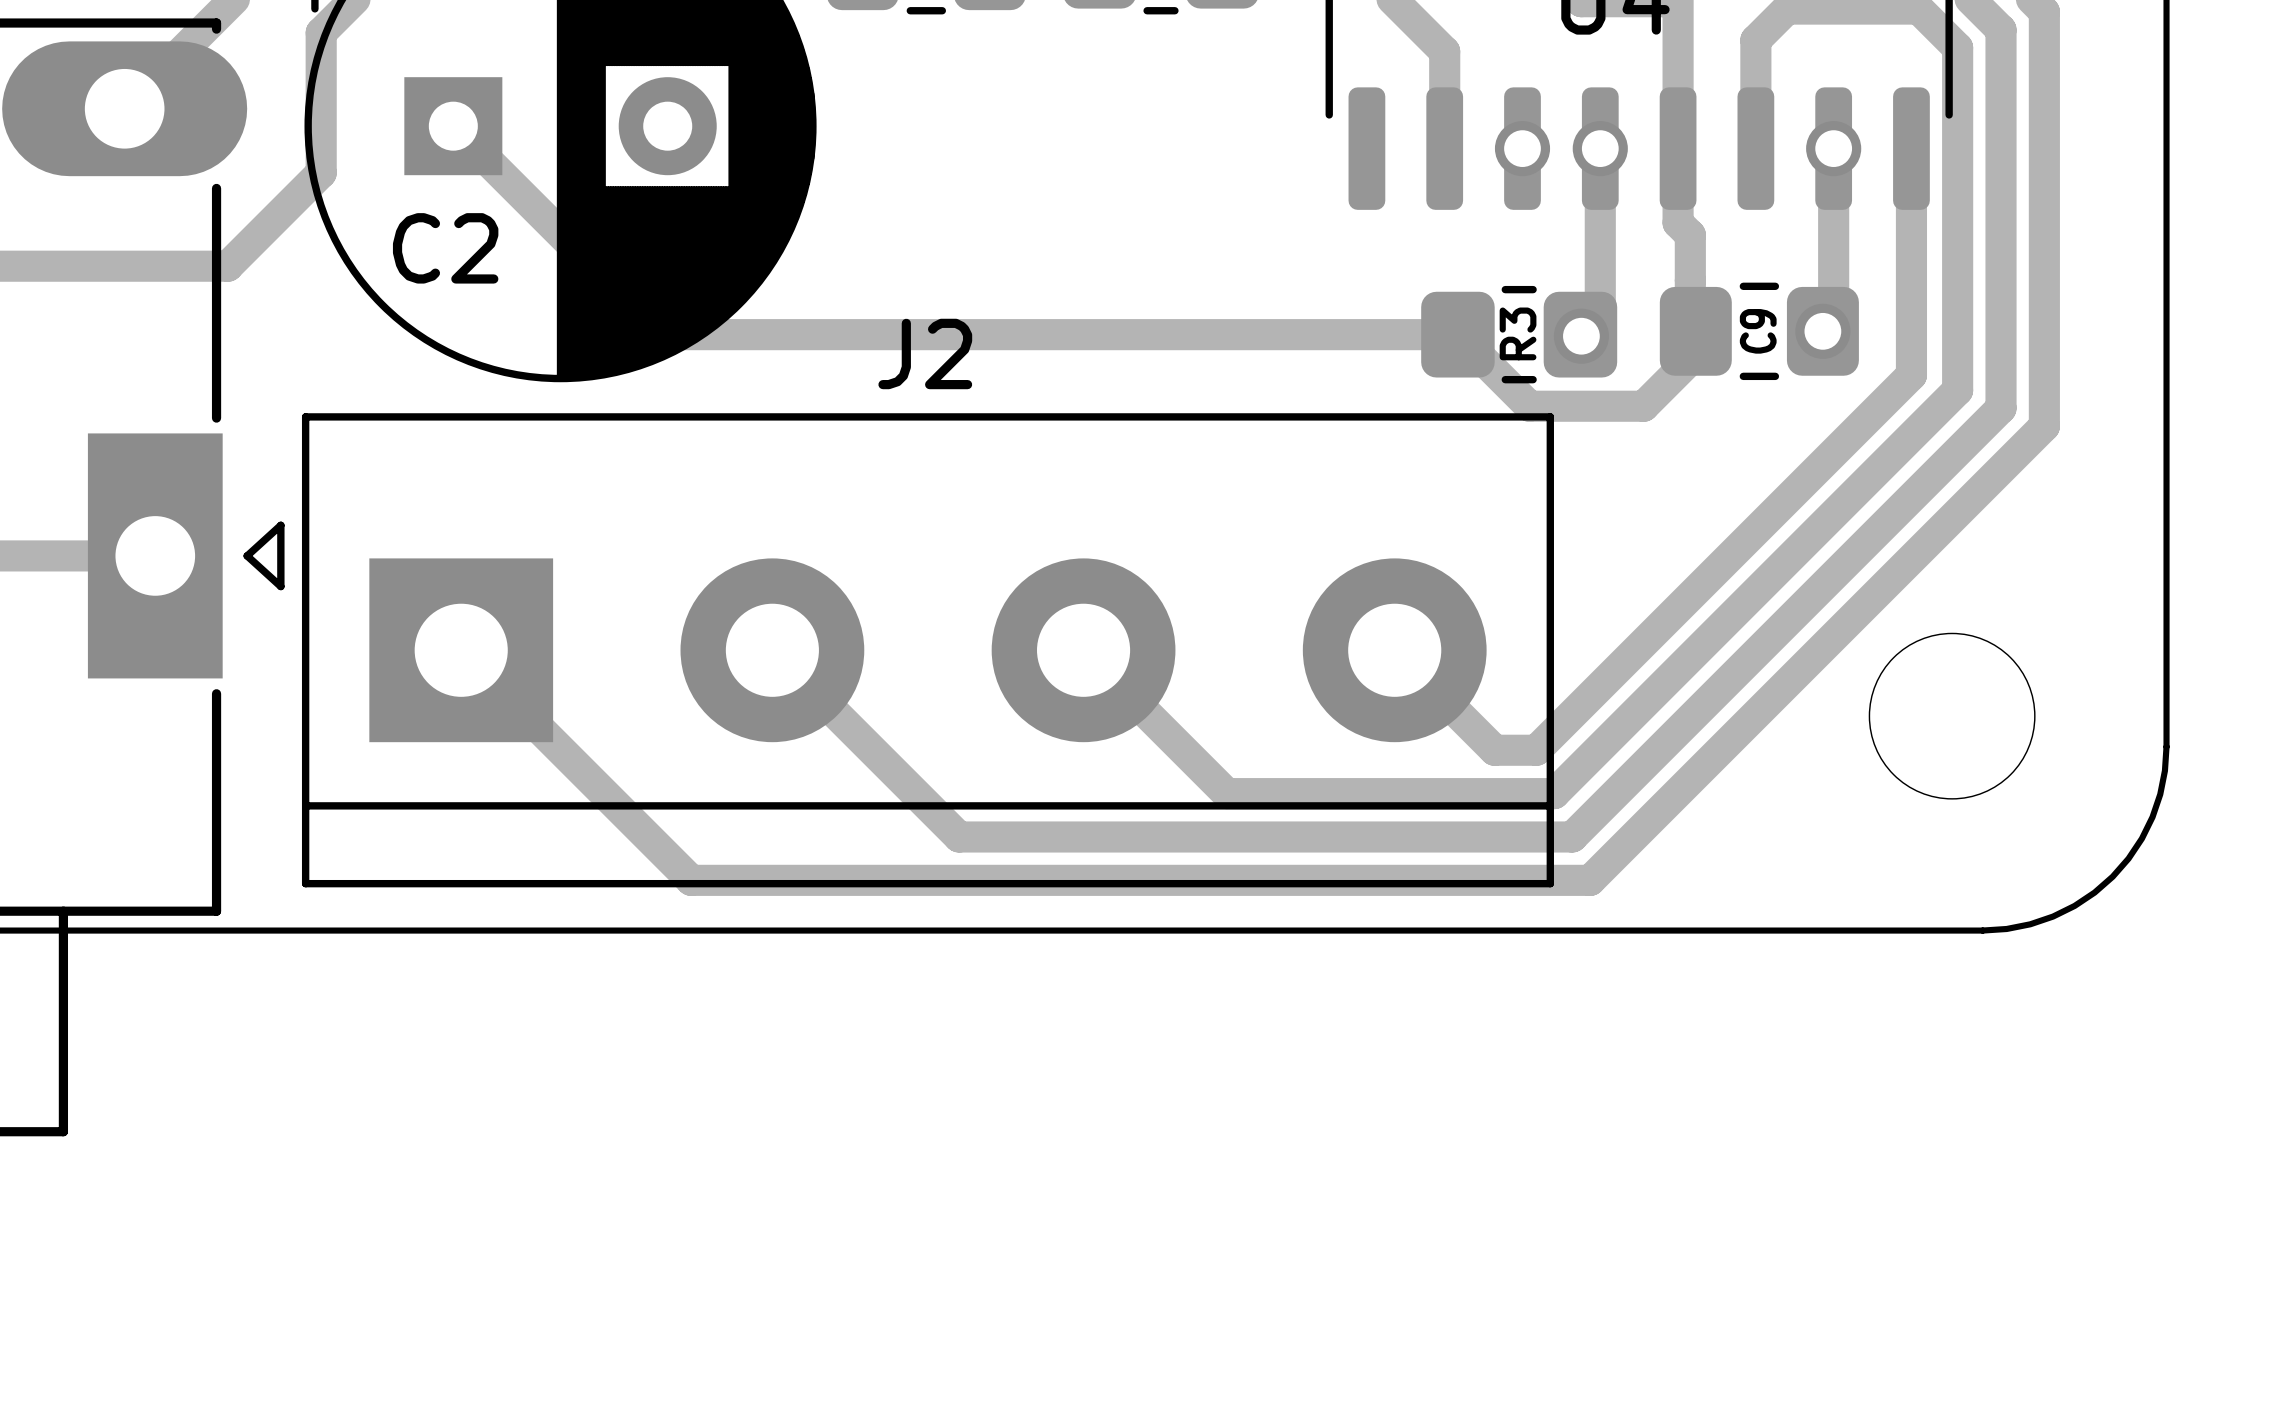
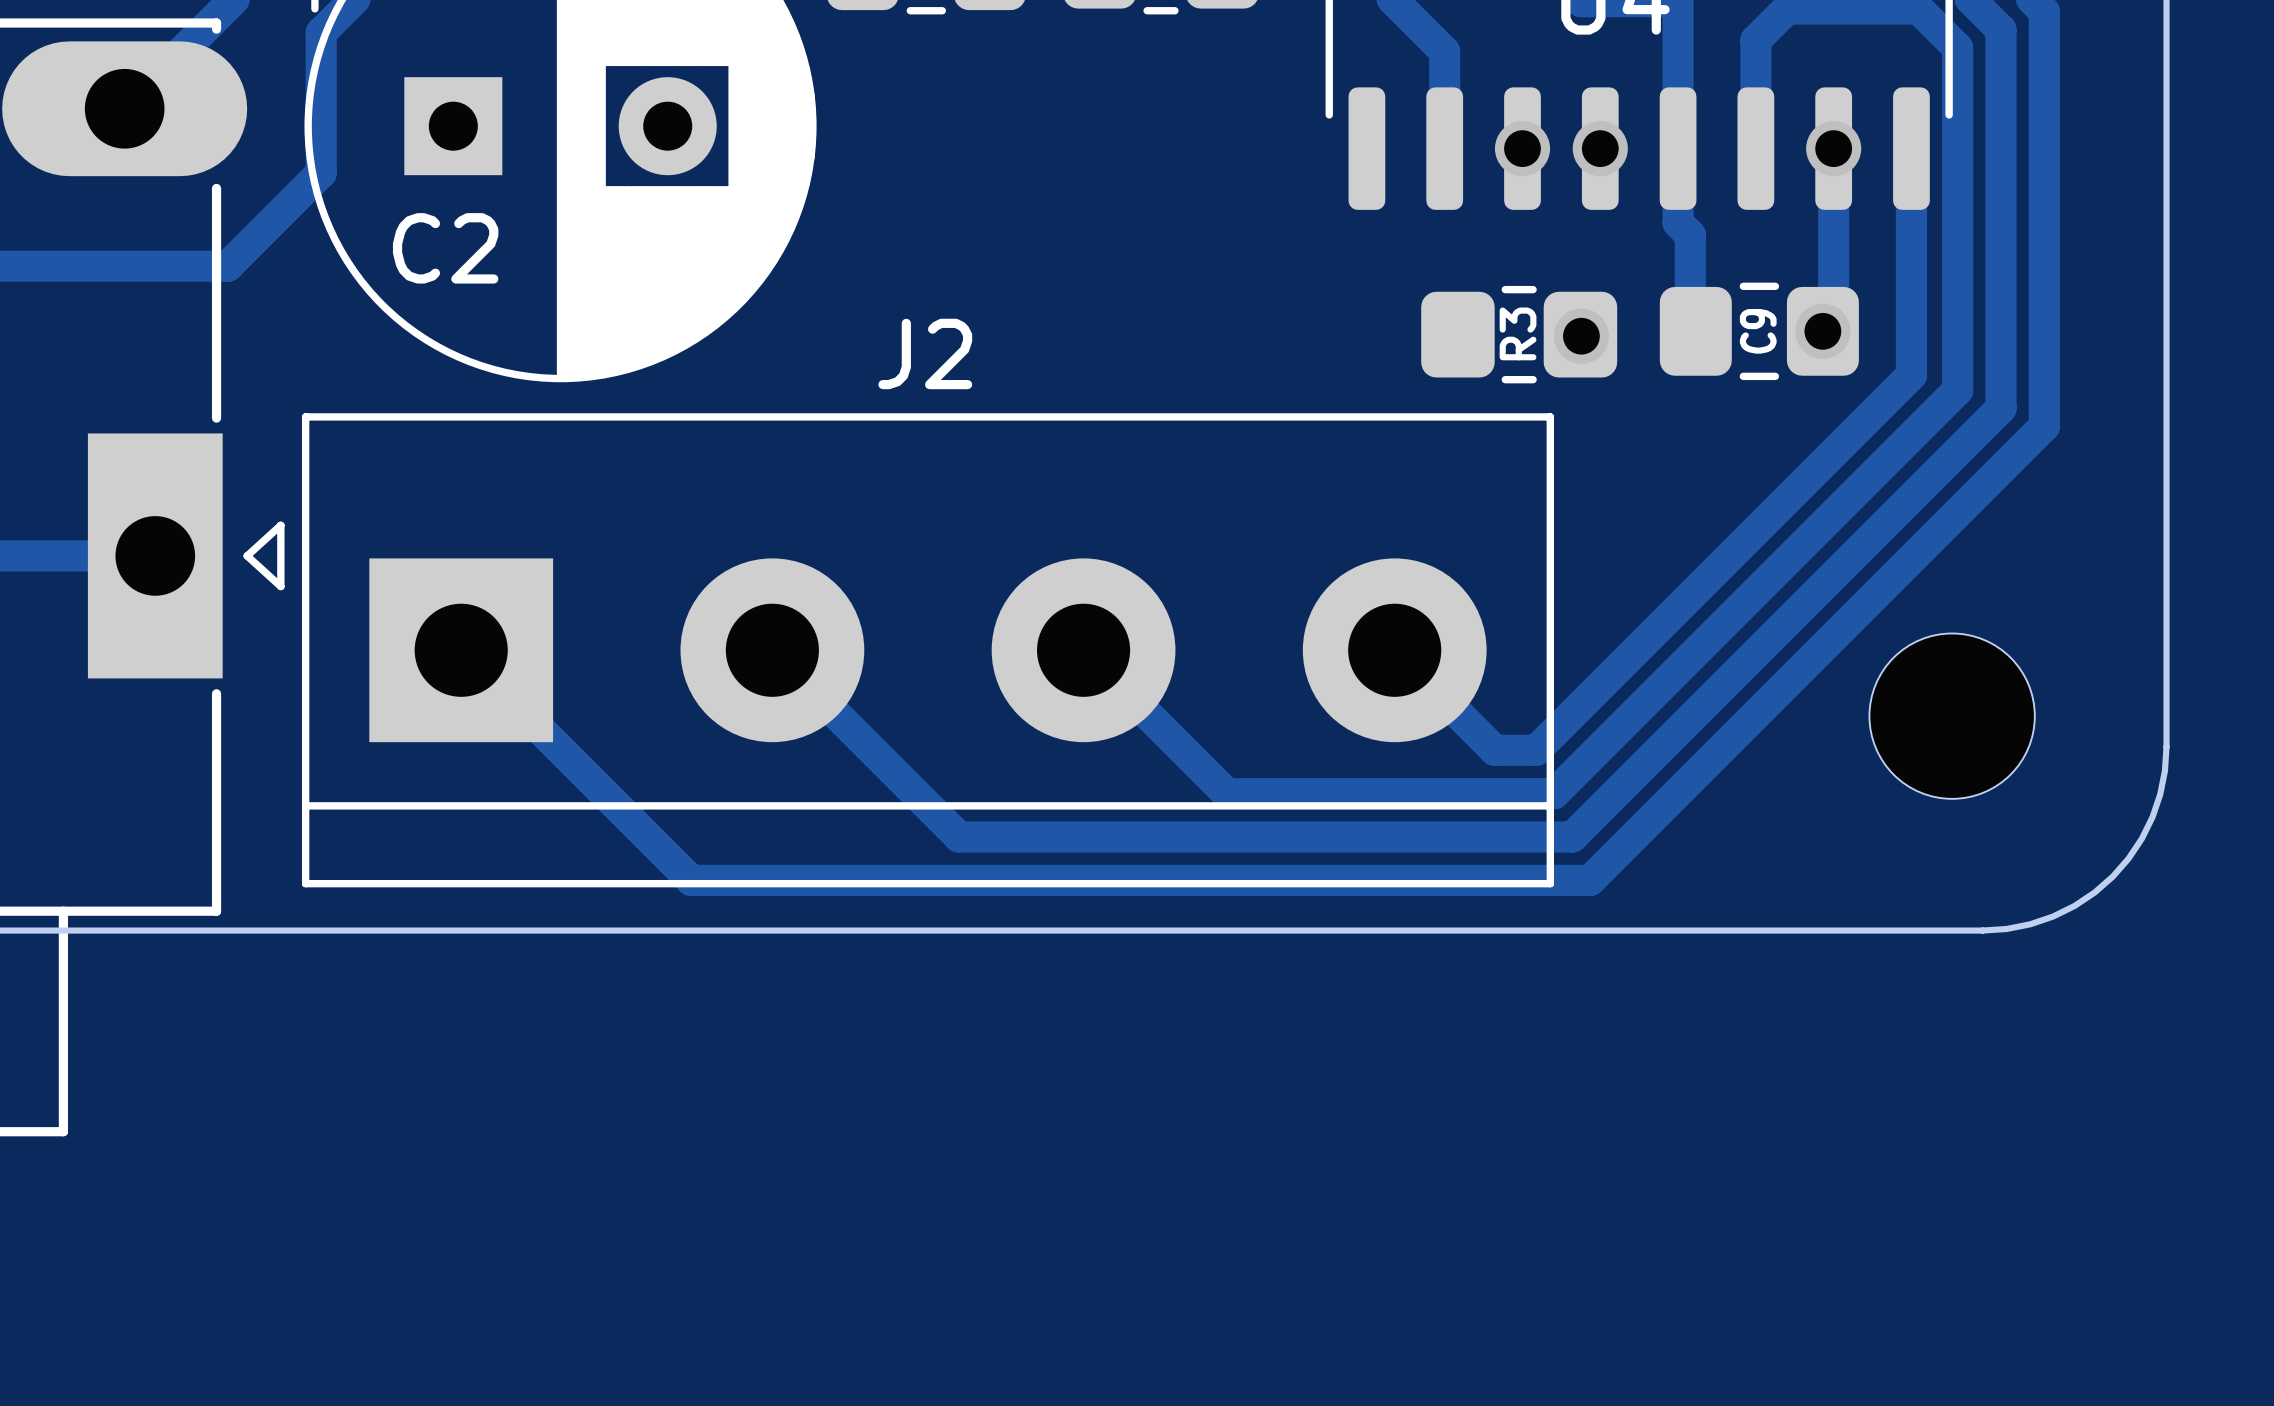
track: (453, 126) (661, 334) (1457, 334) (1529, 406) (1643, 406) (1695, 354) -> none
track: (1600, 148) (1600, 314) -> none

